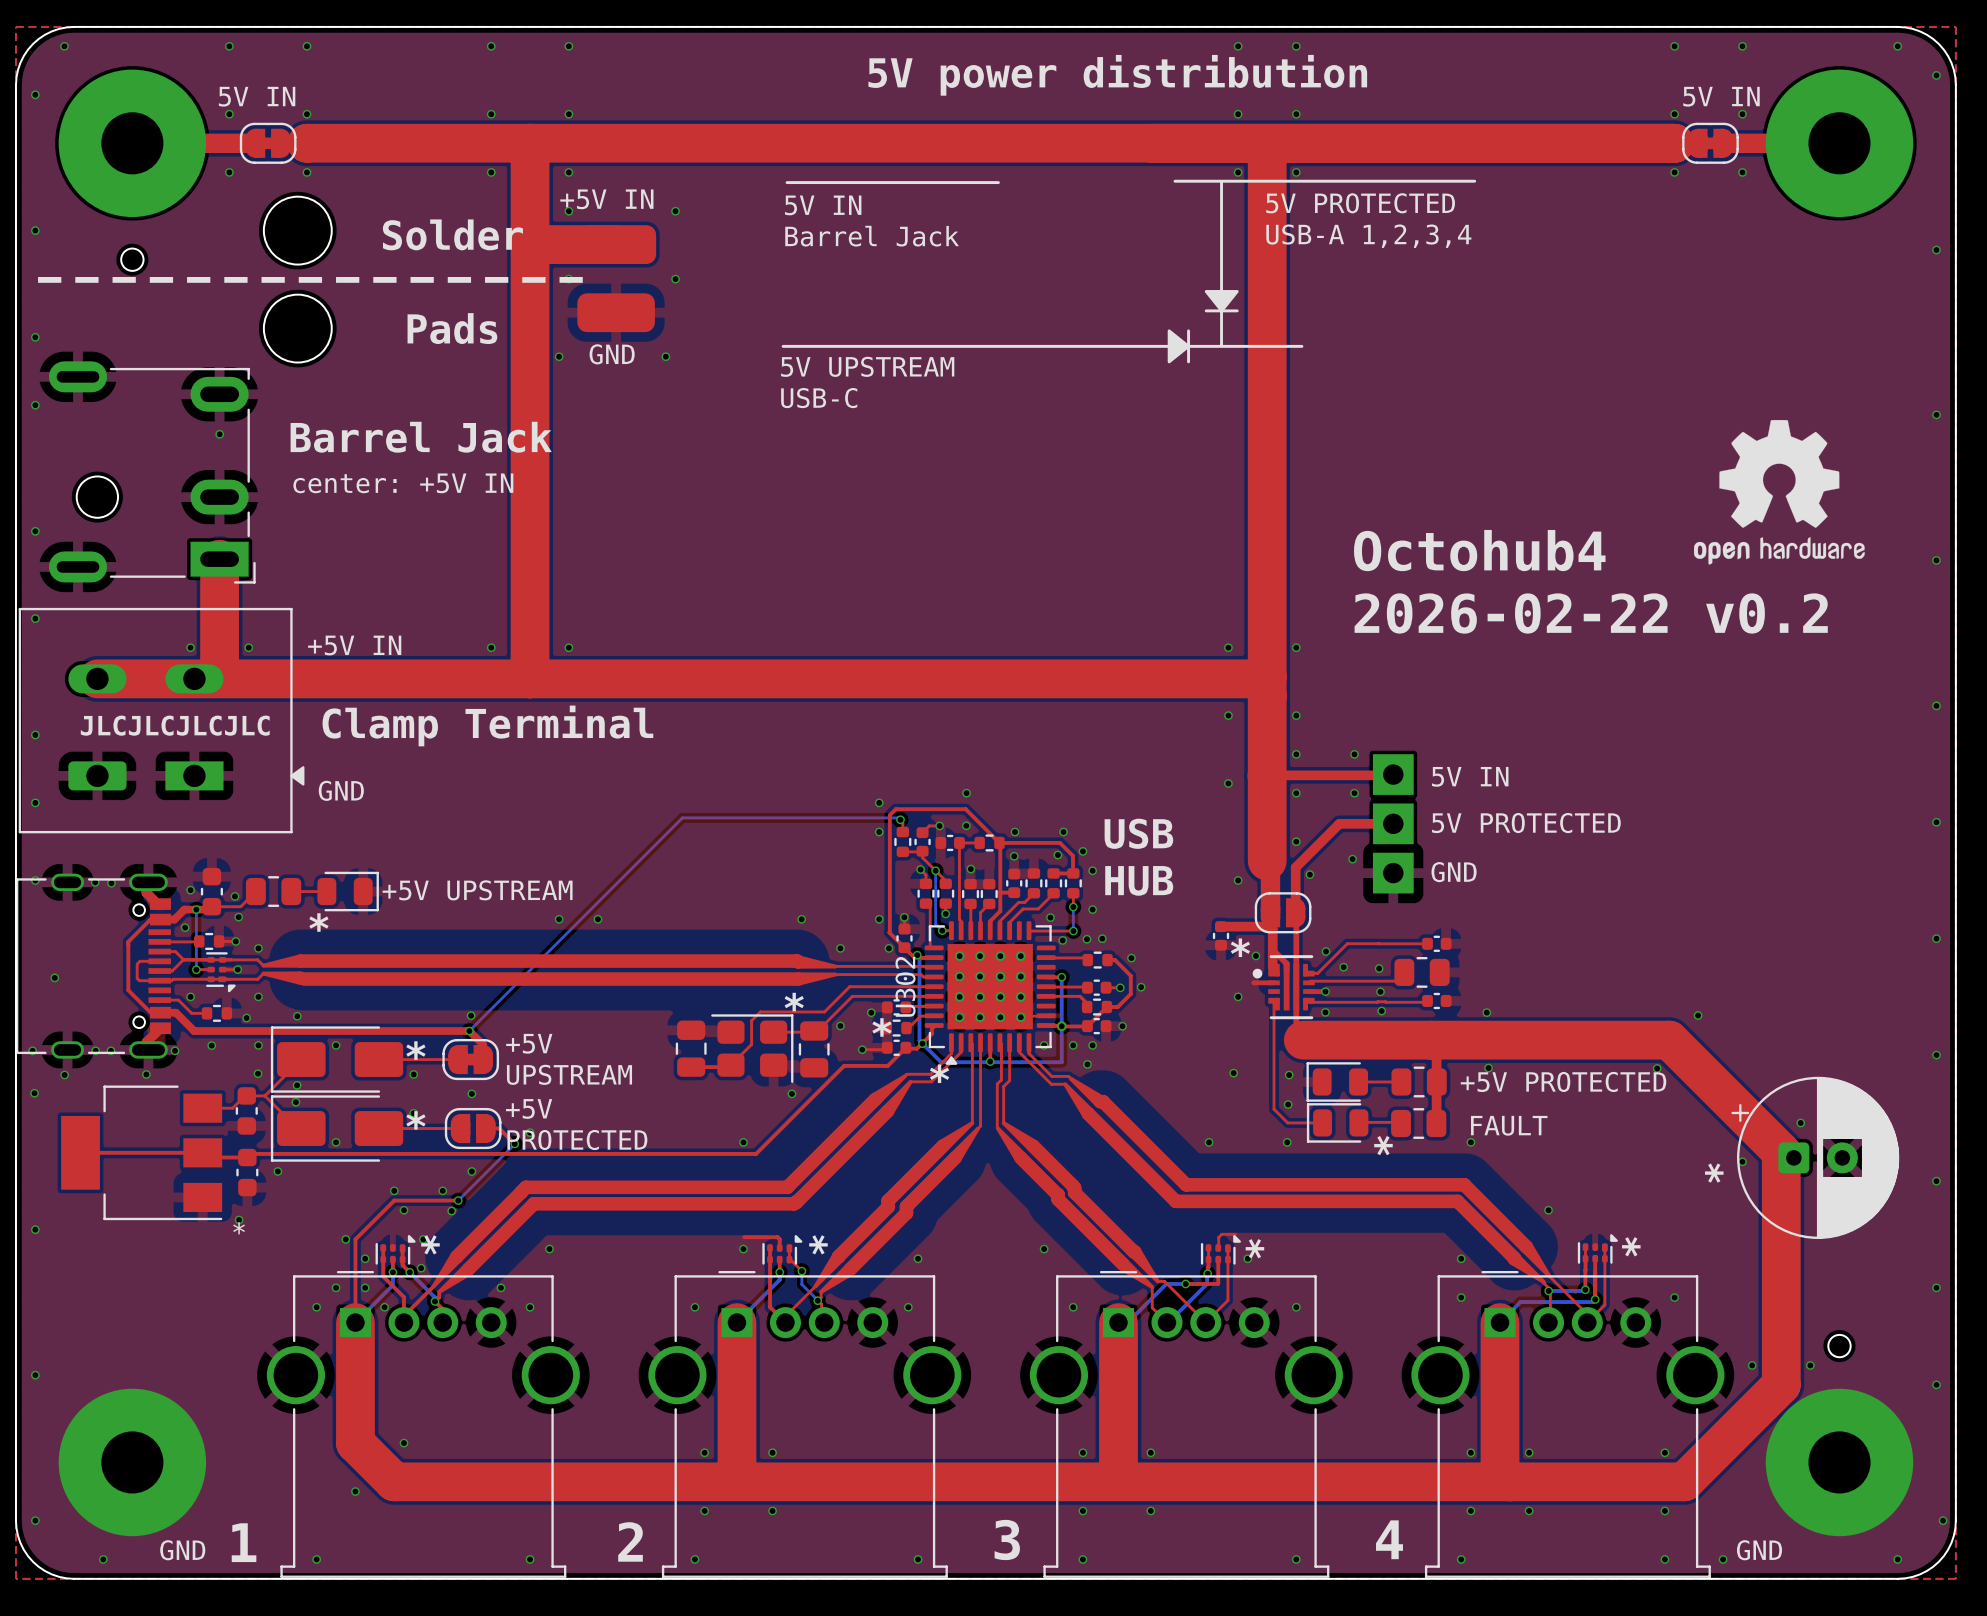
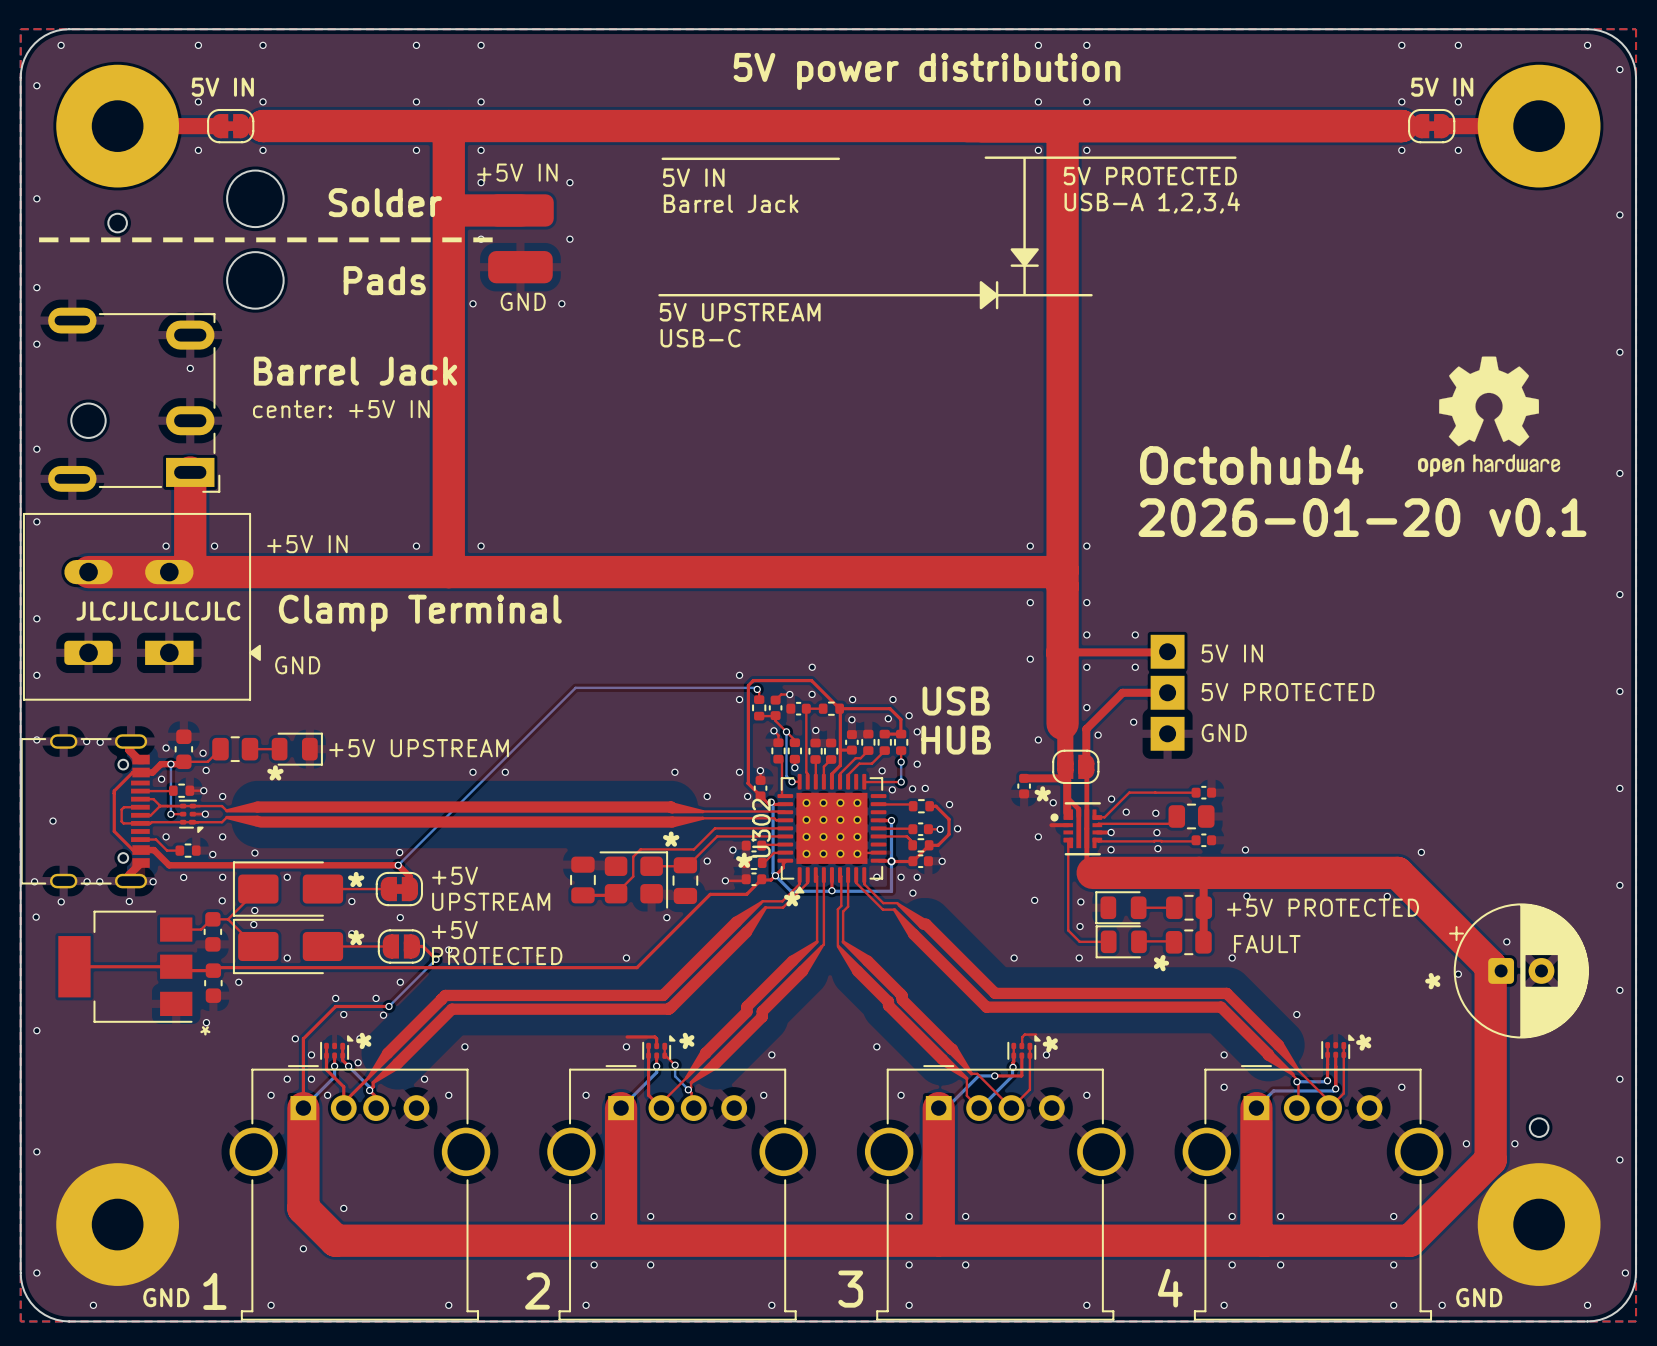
text: 2026-02-22 v0.2 (1591, 613) -> 2026-01-20 v0.1 (1362, 517)

